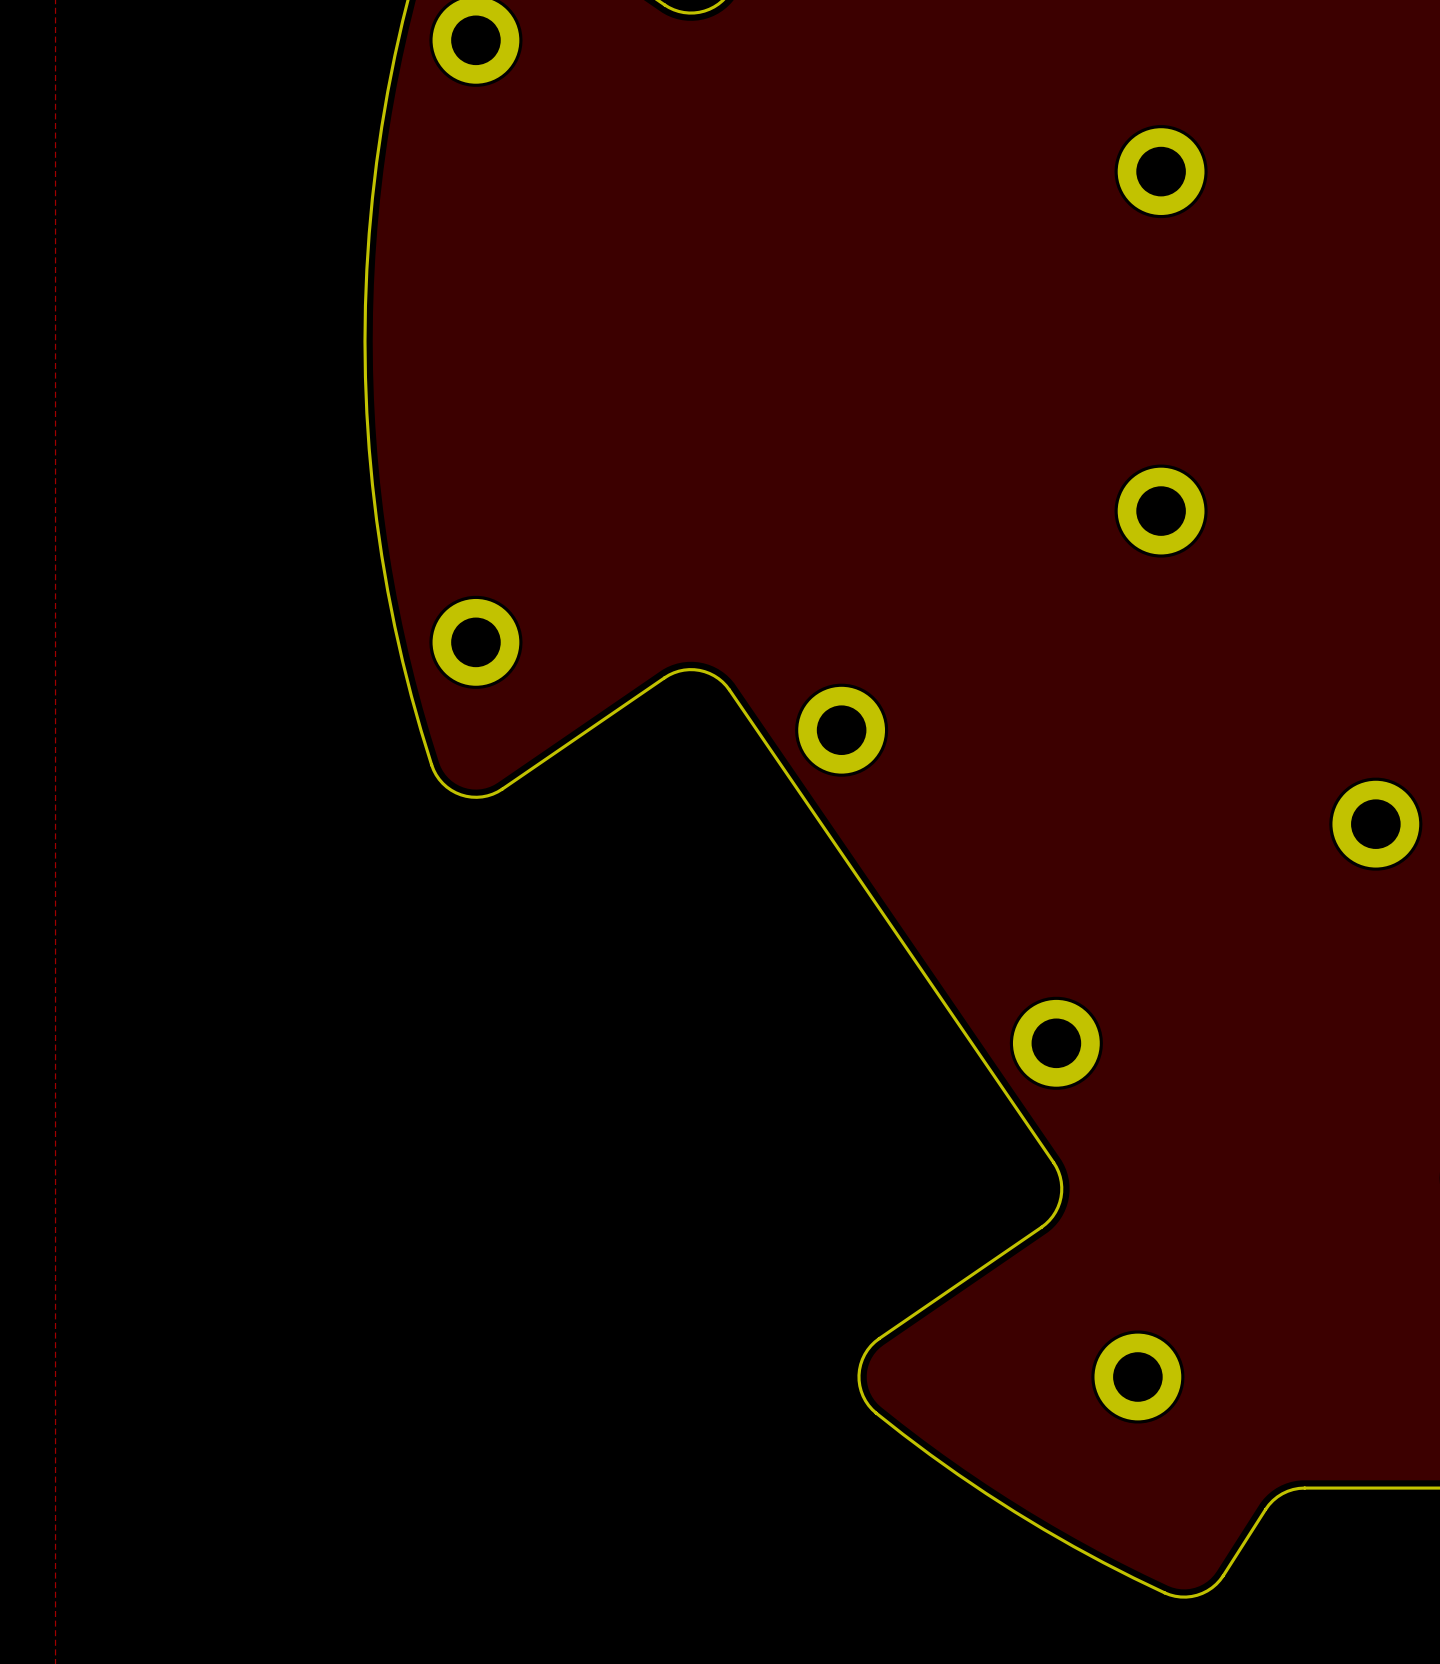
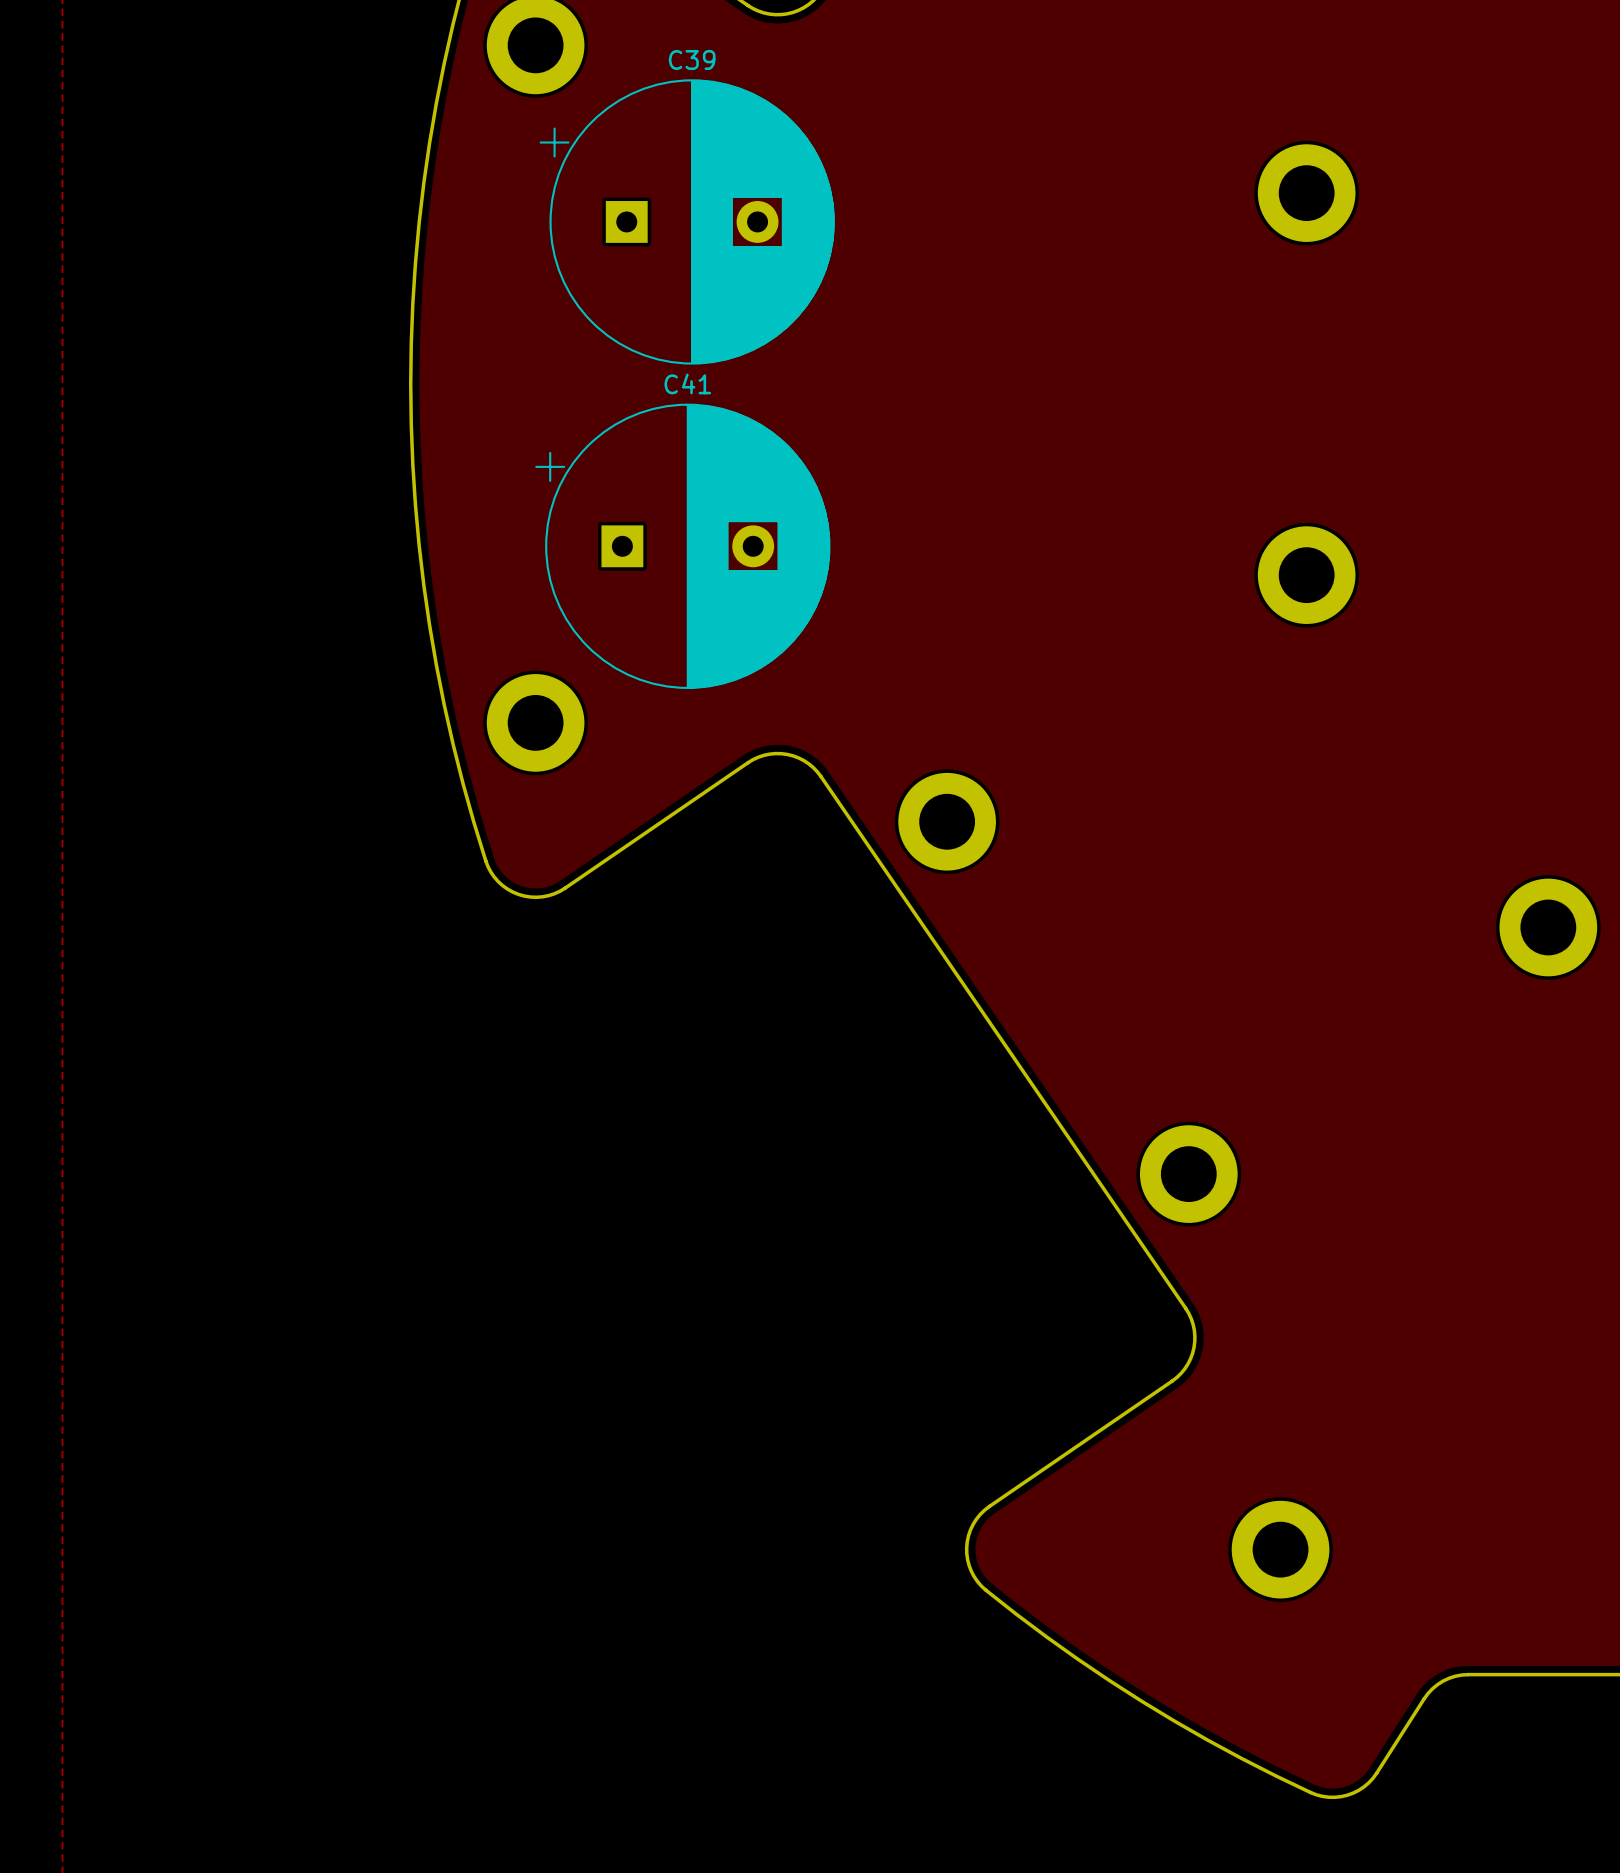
C39: none -> (687, 221)
C41: none -> (682, 546)

